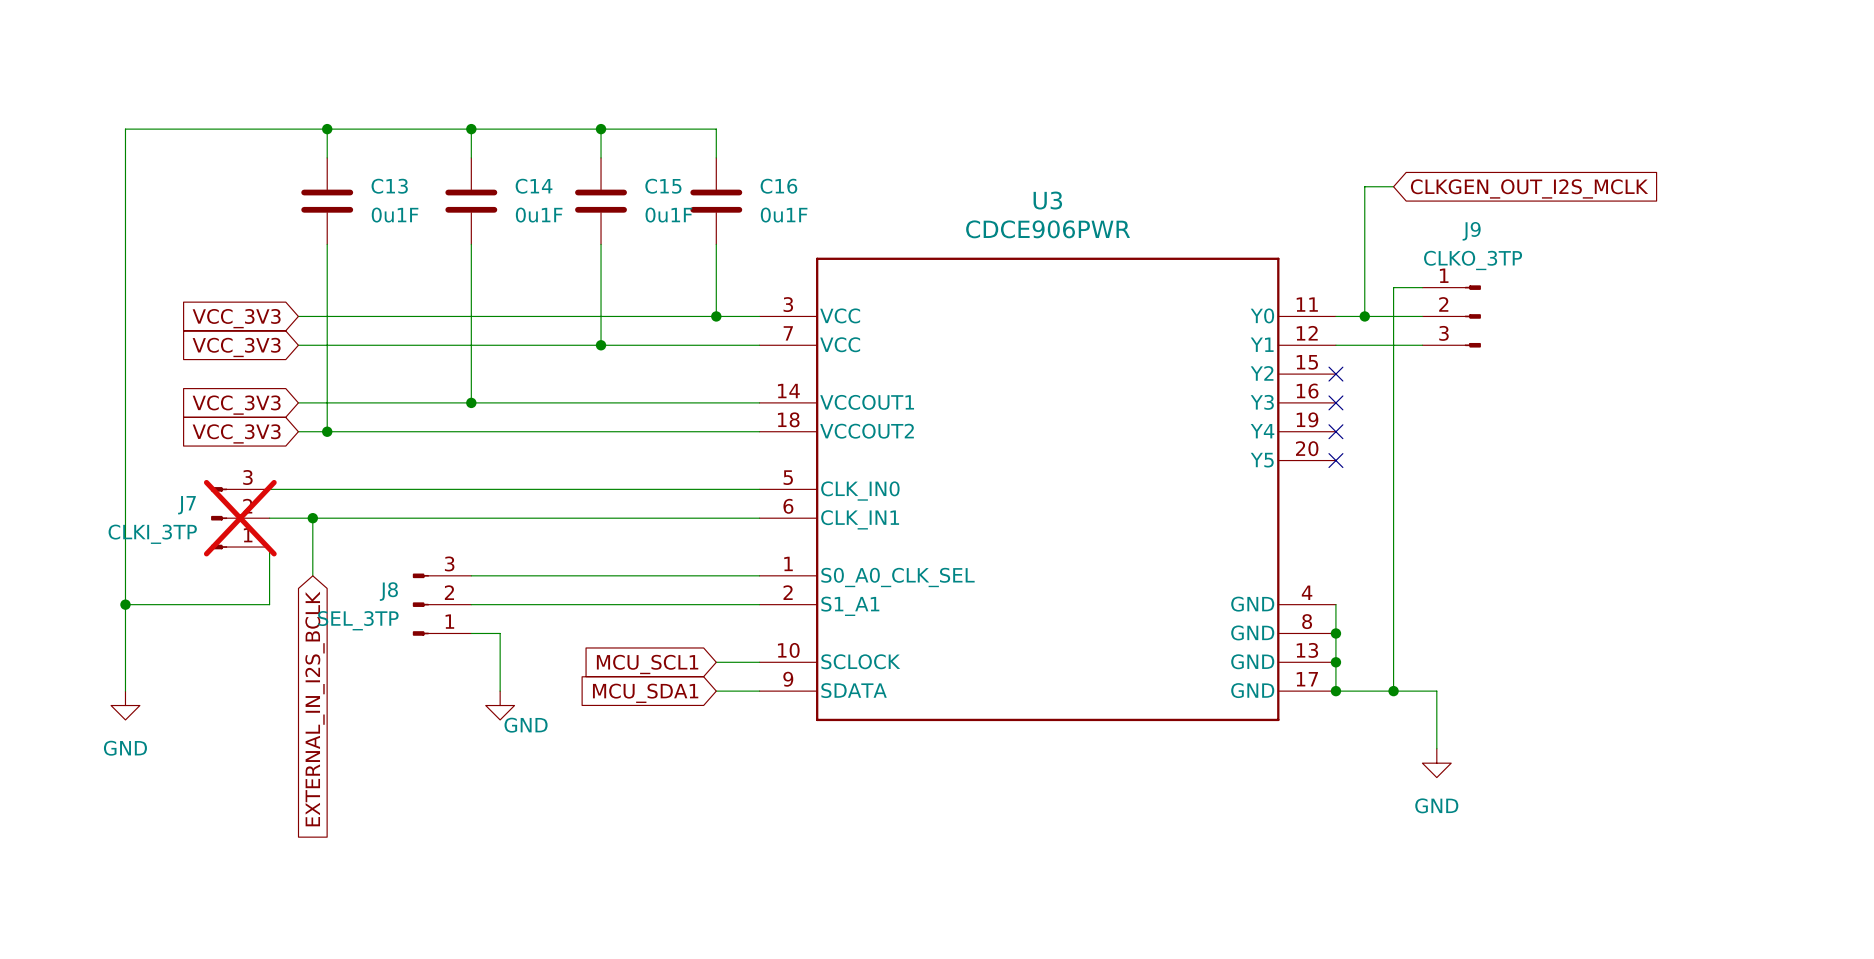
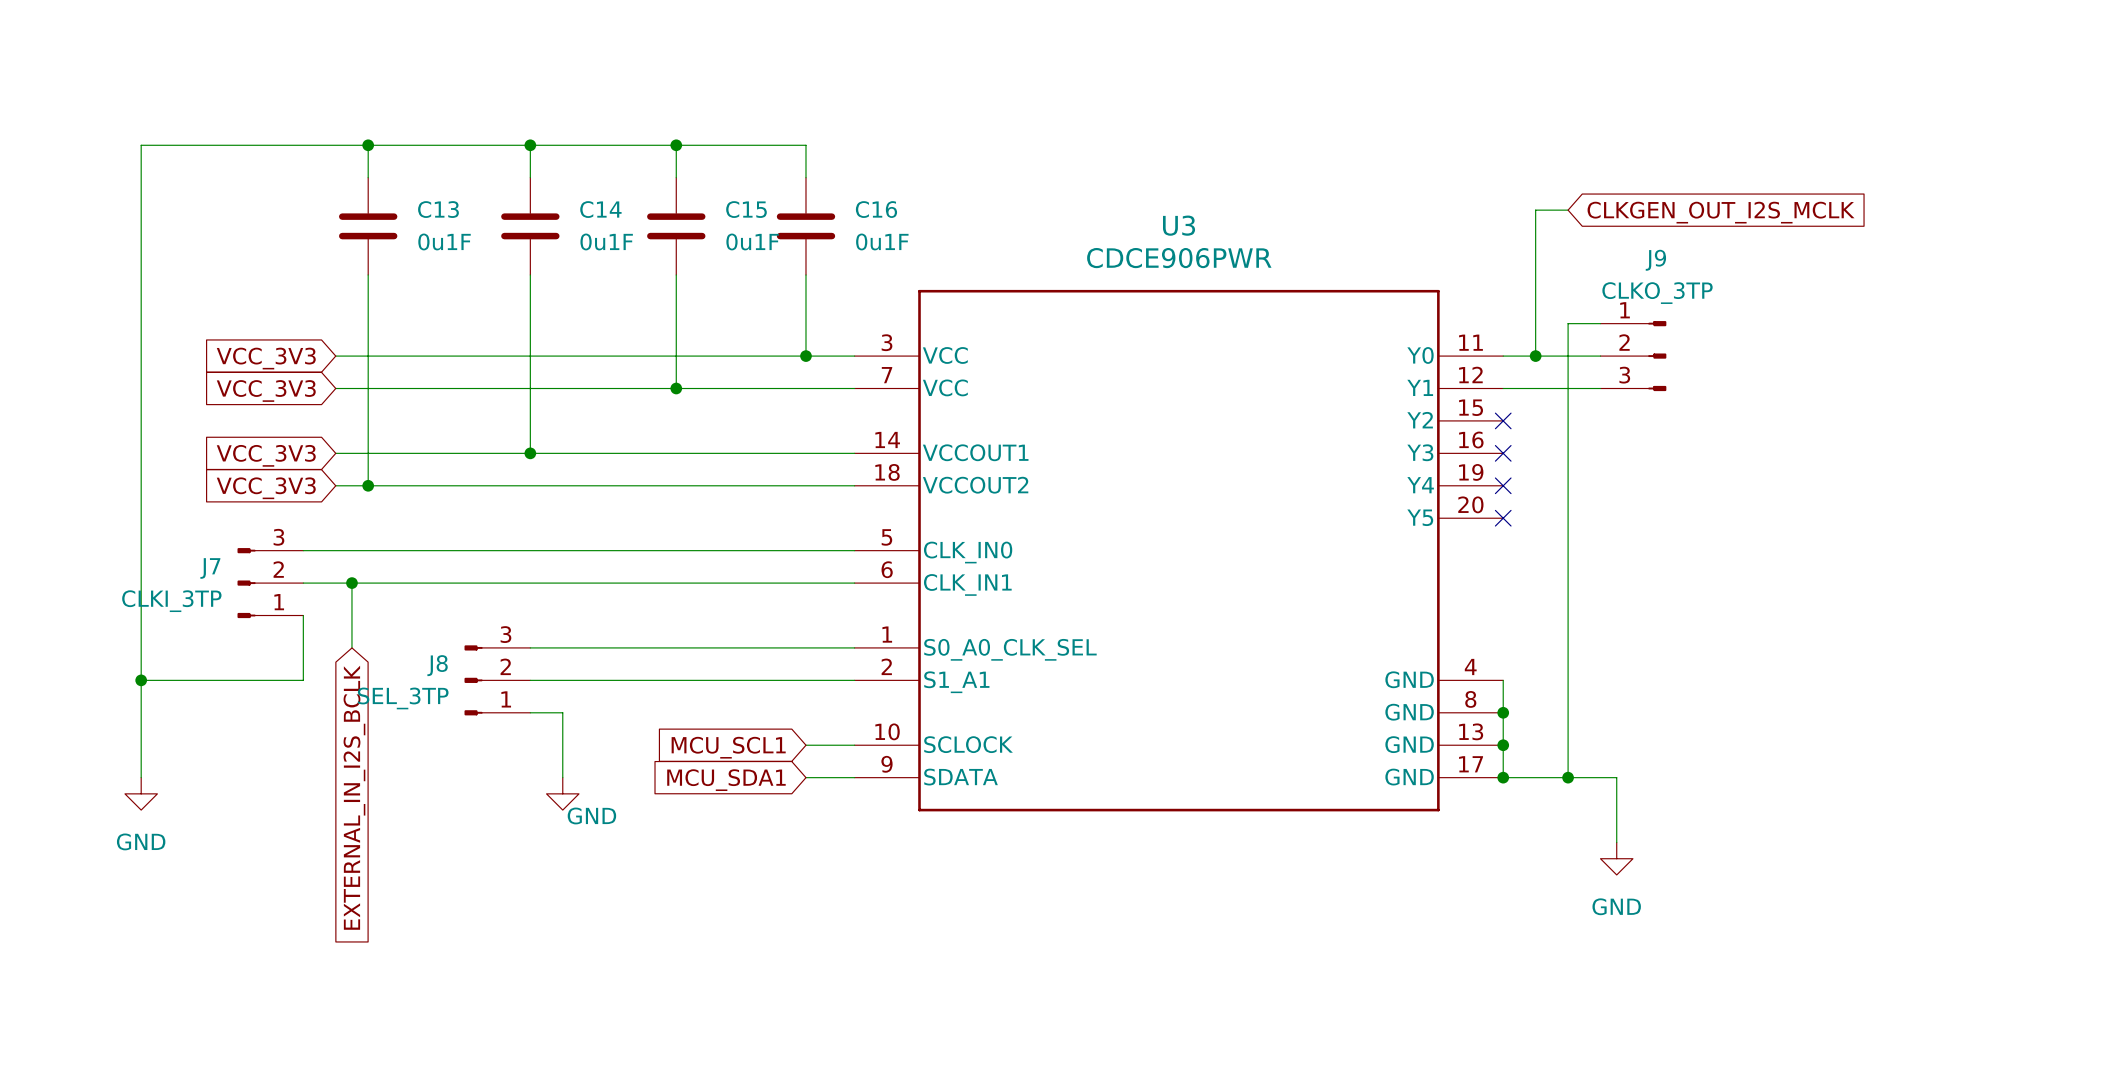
J7 do-not-place cross: (240, 518) -> none

